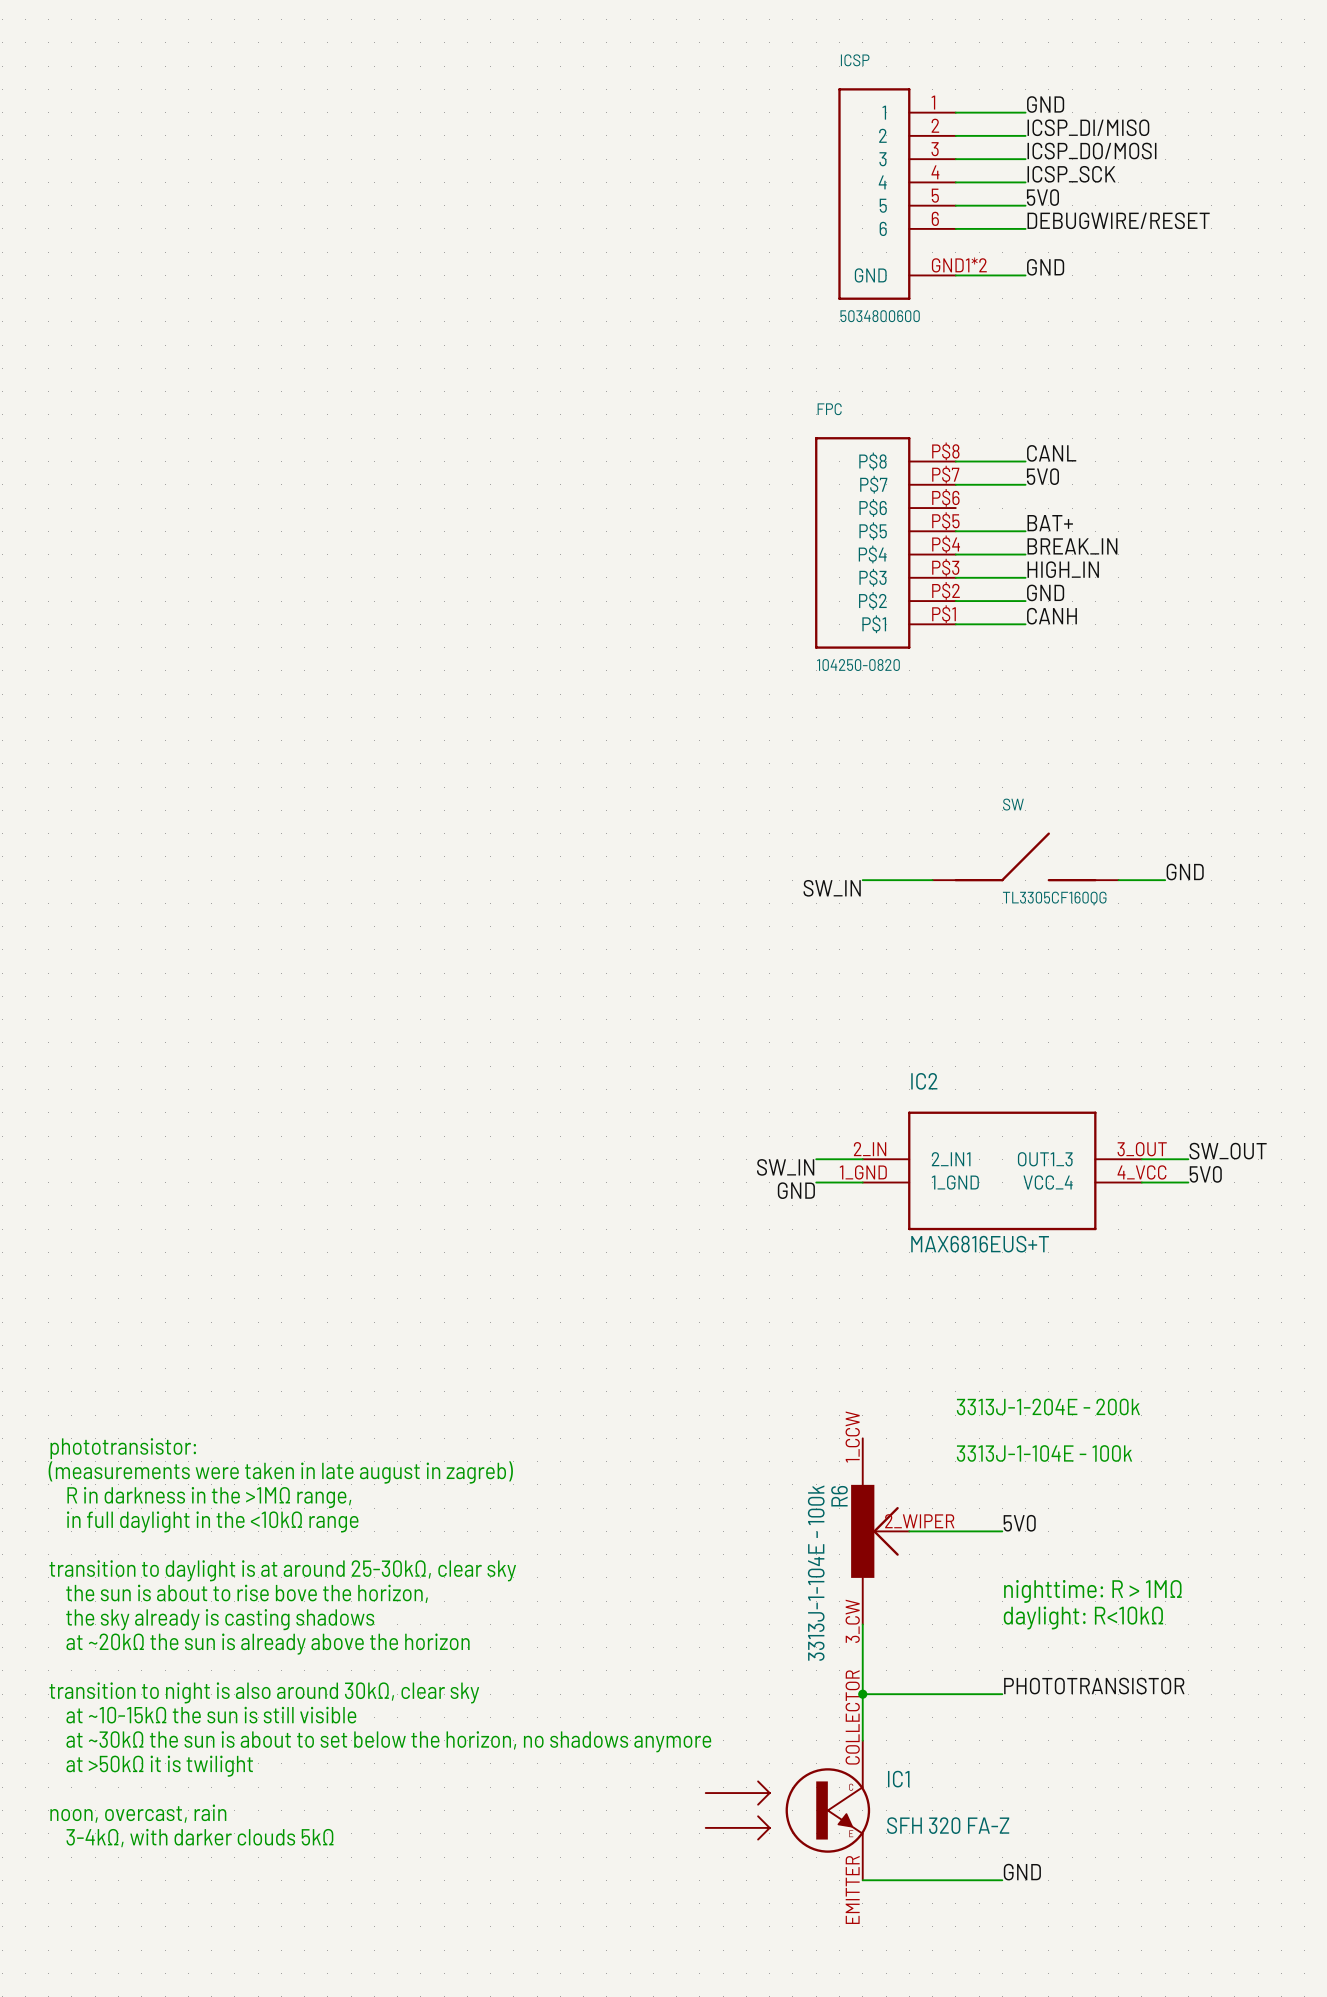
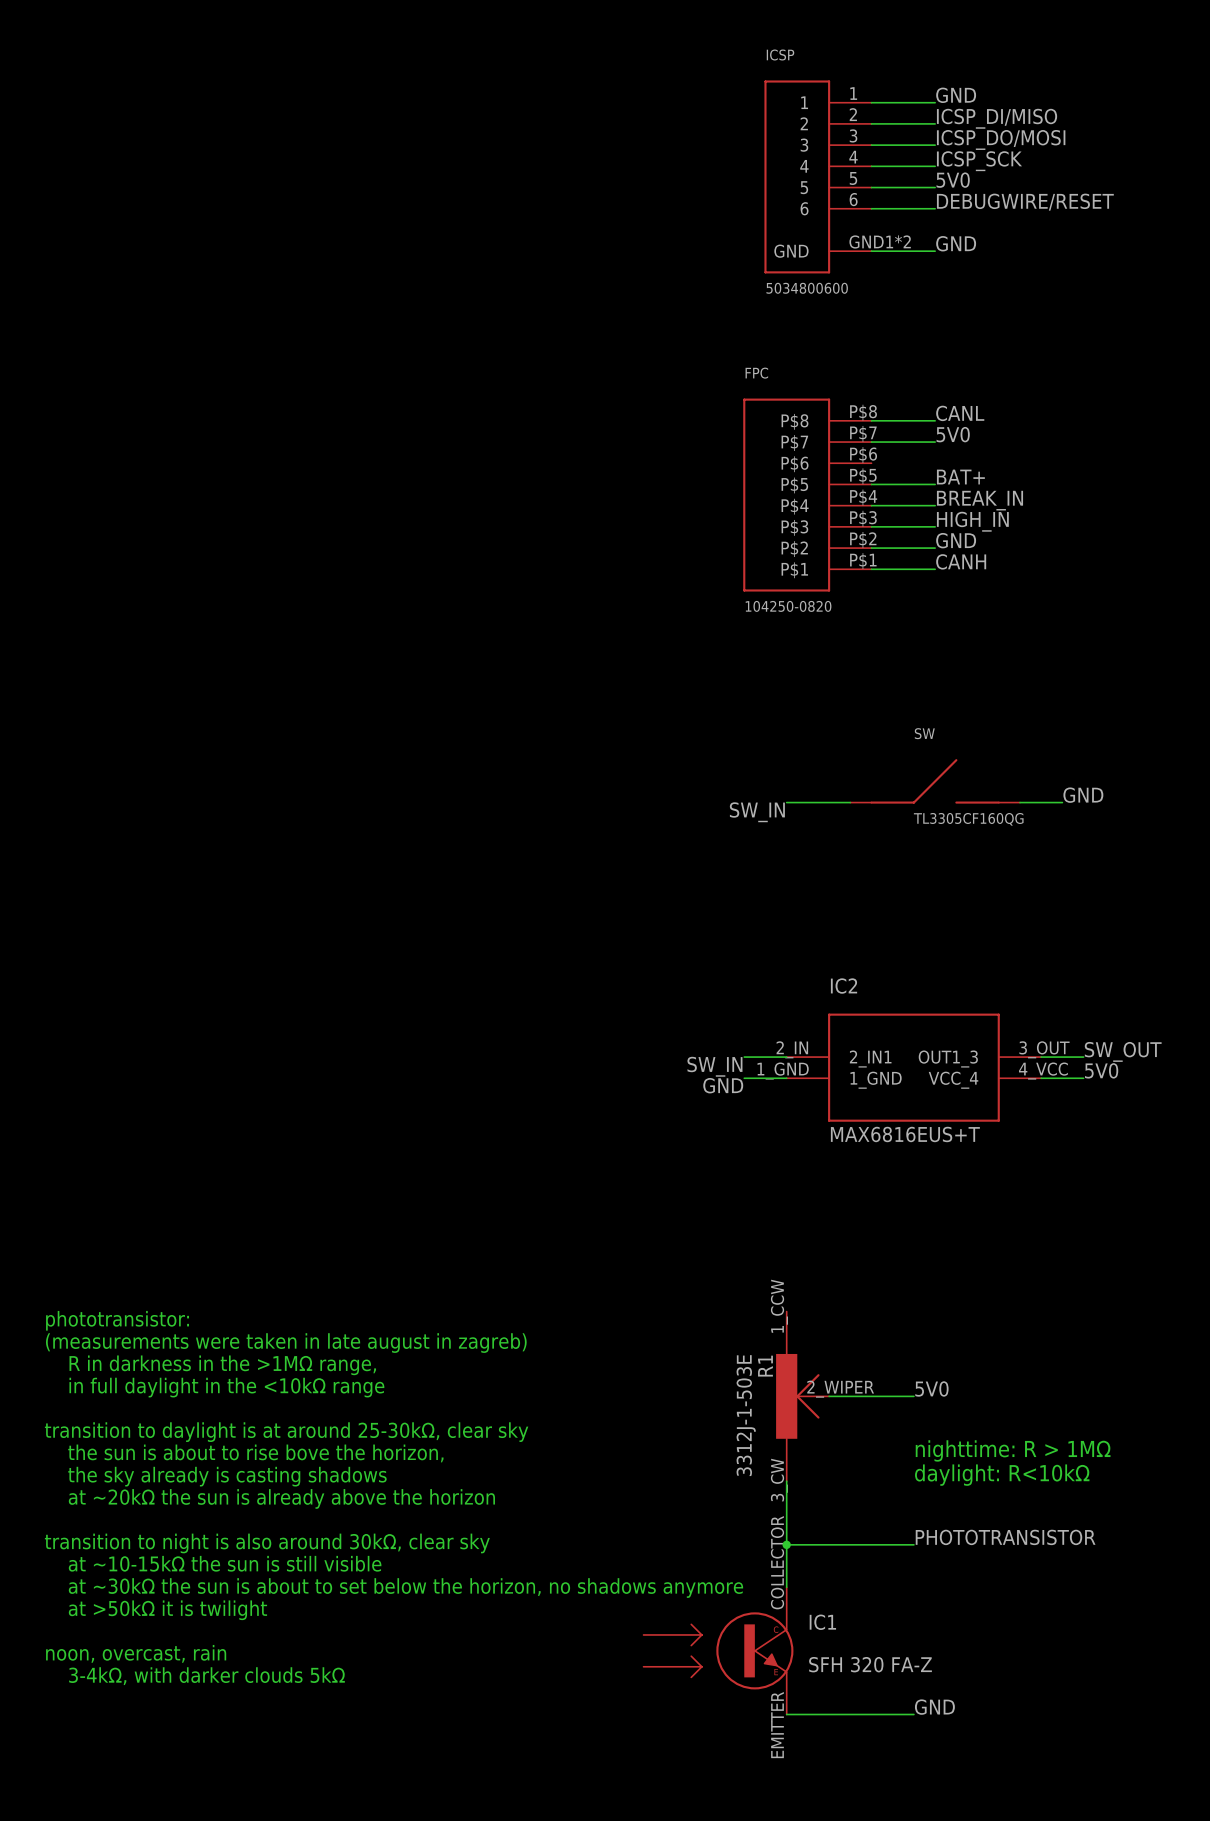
text: 3313J-1-204E - 200k (1048, 1406) -> none
text: 3313J-1-104E - 100k (1044, 1453) -> none
R6 name: R6 (839, 1496) -> R1 (765, 1366)
R6 value: 3313J-1-104E - 100k (816, 1573) -> 3312J-1-503E (746, 1415)

